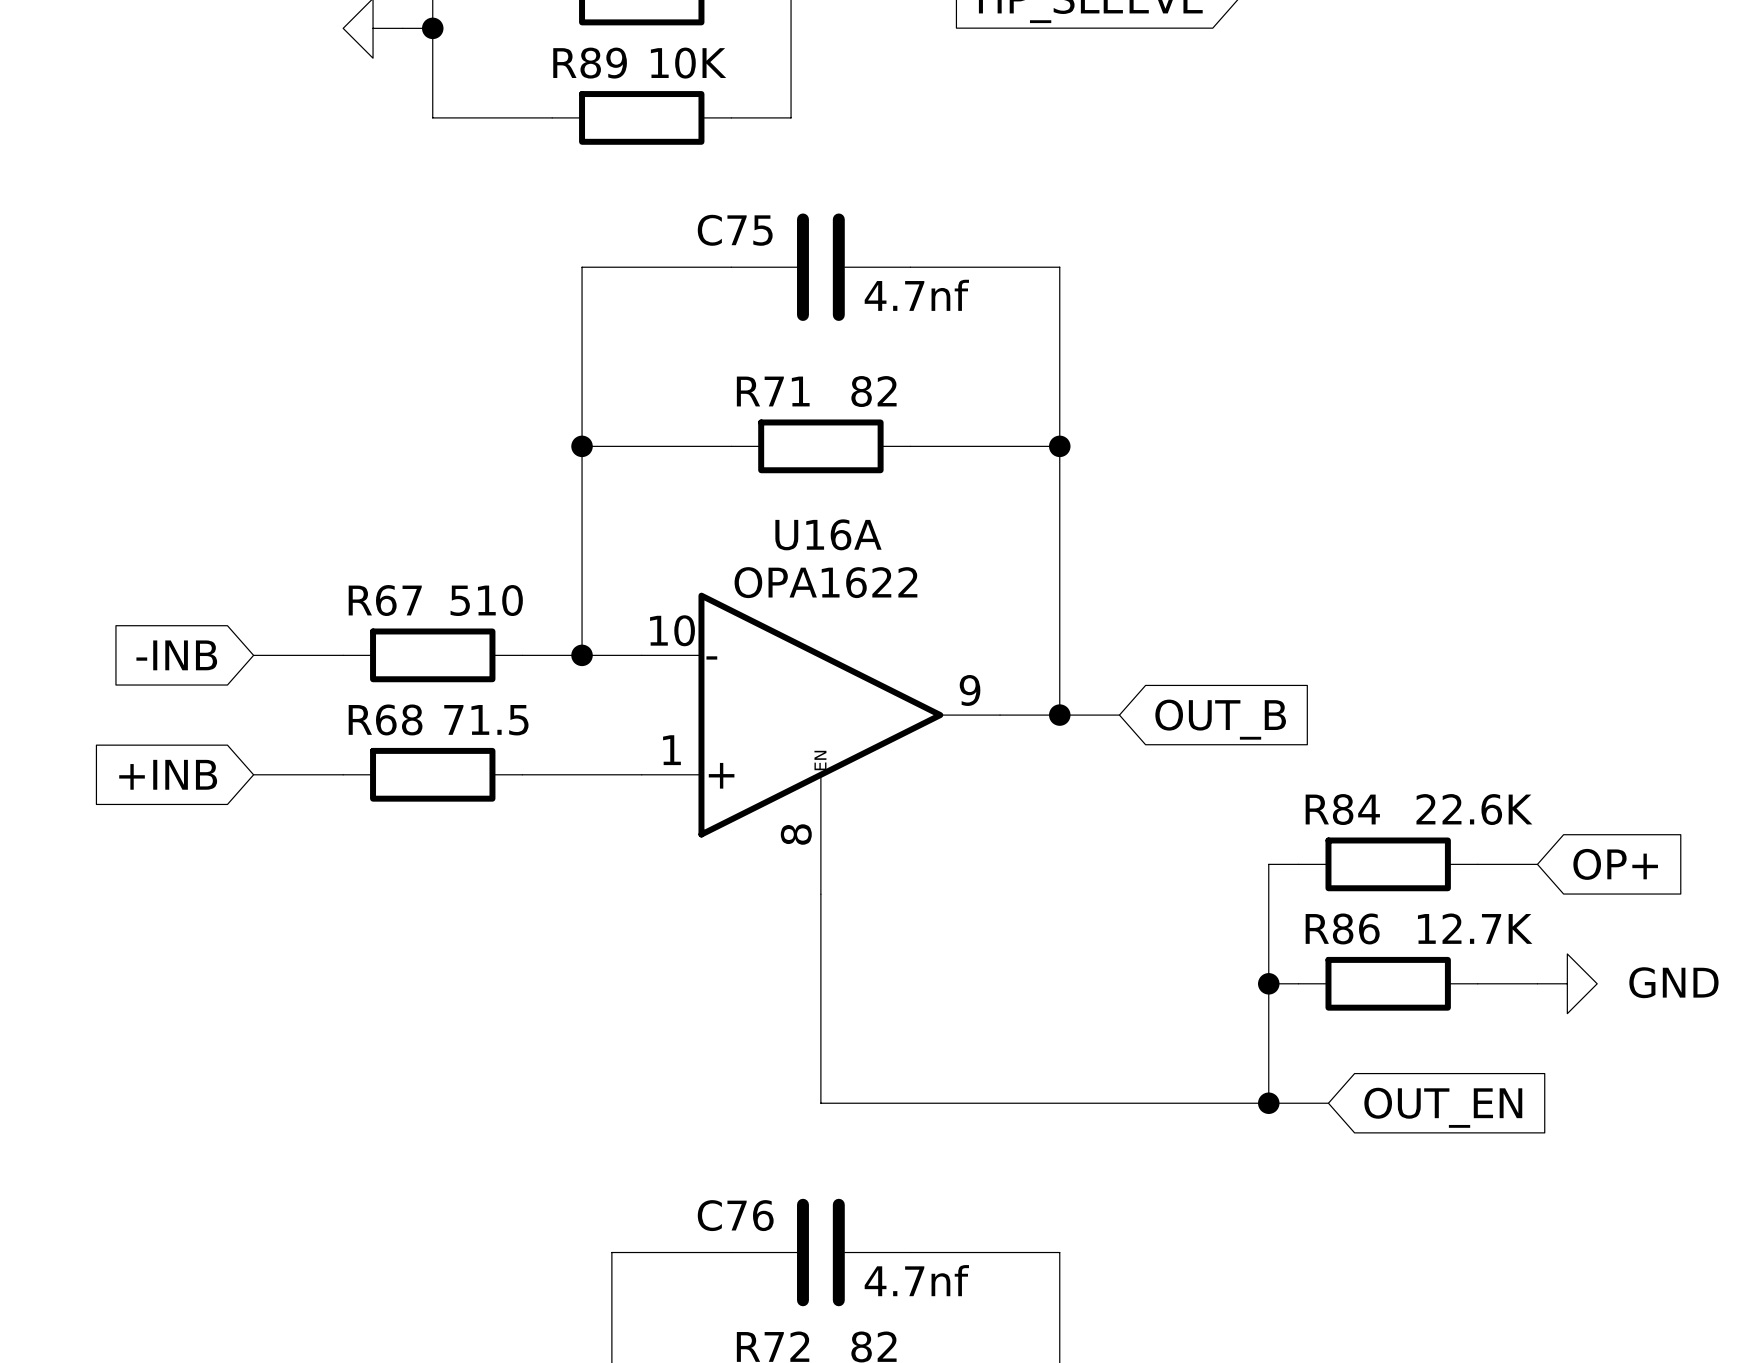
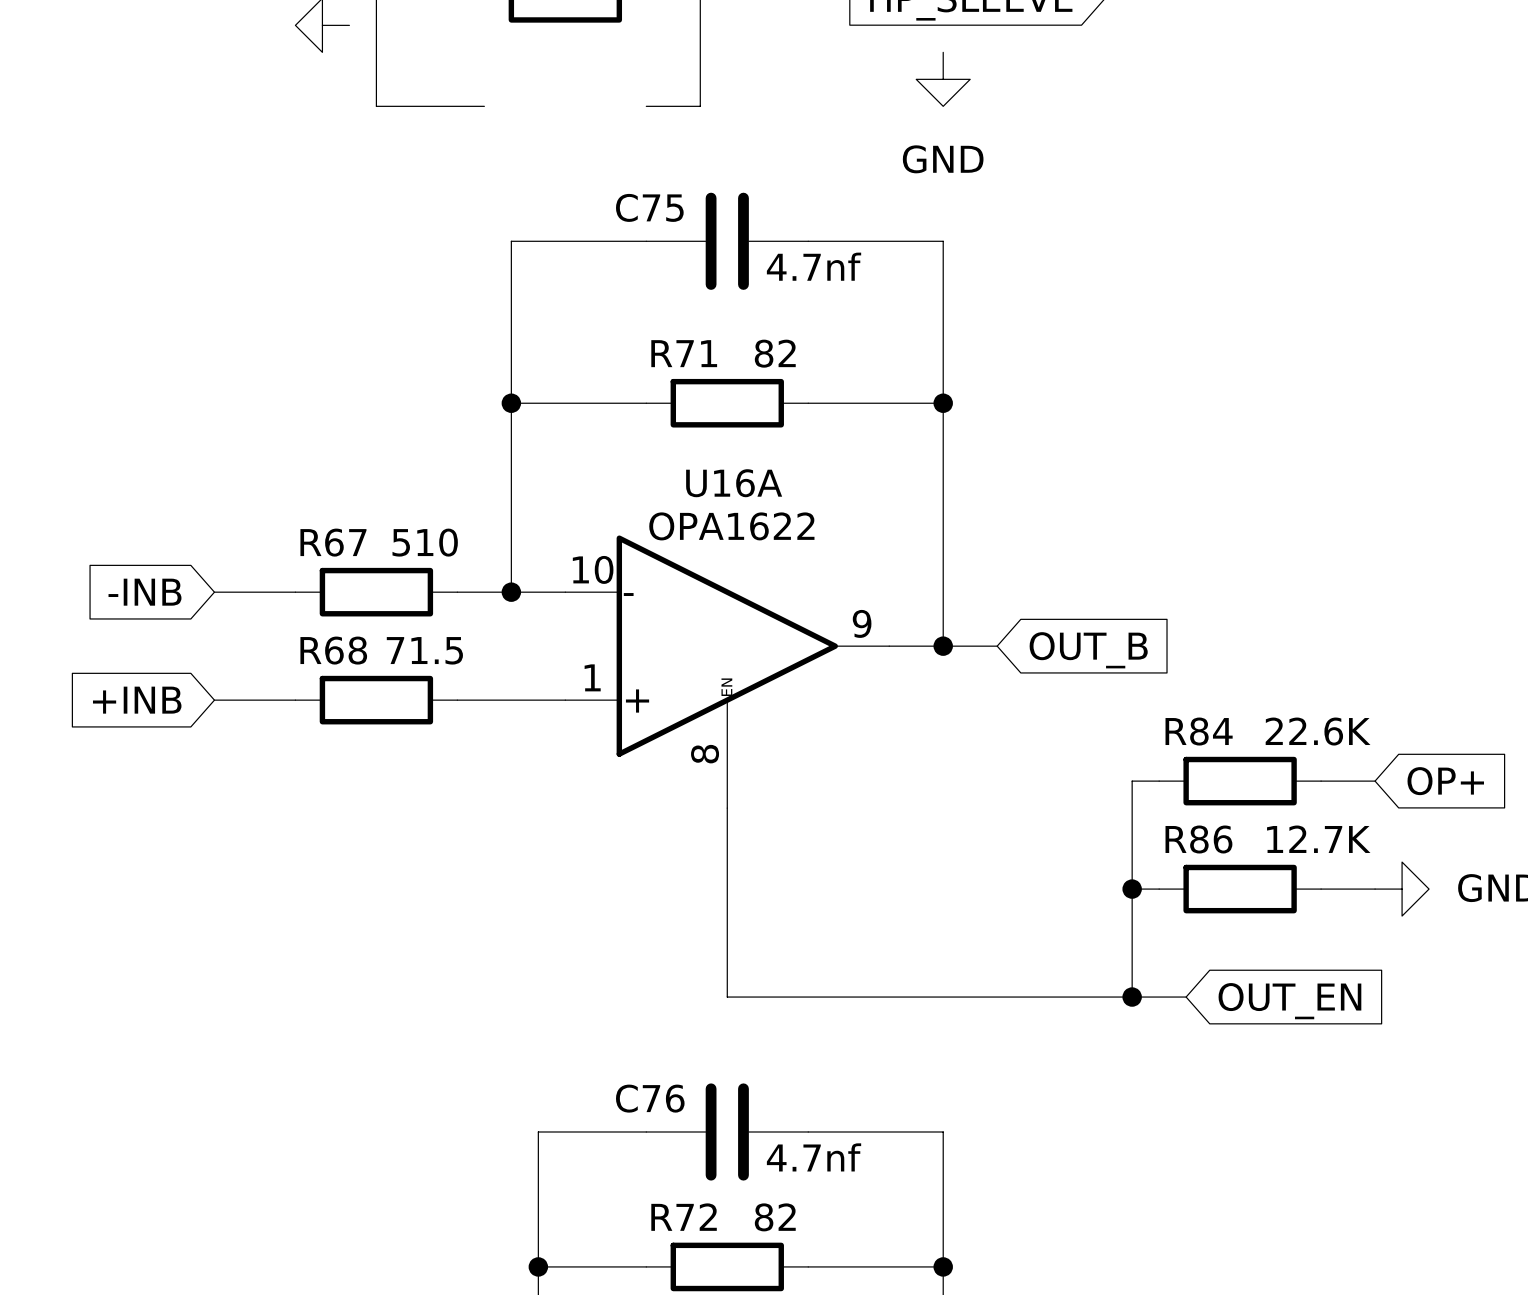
wire: (402, 28) (432, 28) -> none
junction: (432, 28) -> none
power symbol: none -> GND (943, 79)
R89: 10K (641, 117) -> none

